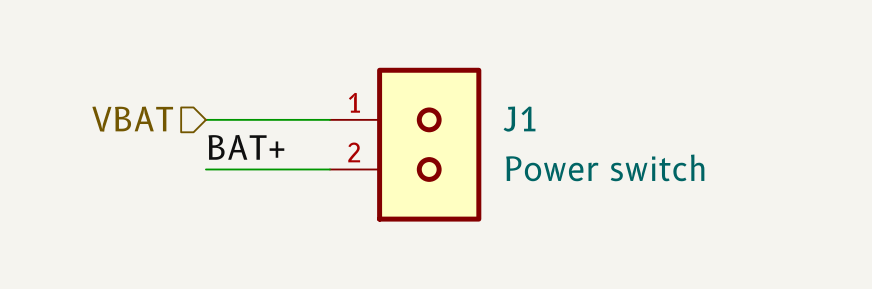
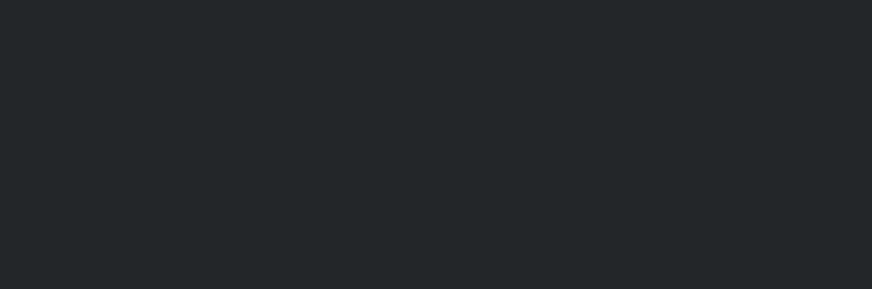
hierarchical label: VBAT (132, 119) -> none
wire: (205, 119) (329, 119) -> none
J1: Power switch (405, 144) -> none
label: BAT+ (246, 147) -> none
wire: (205, 169) (329, 169) -> none

